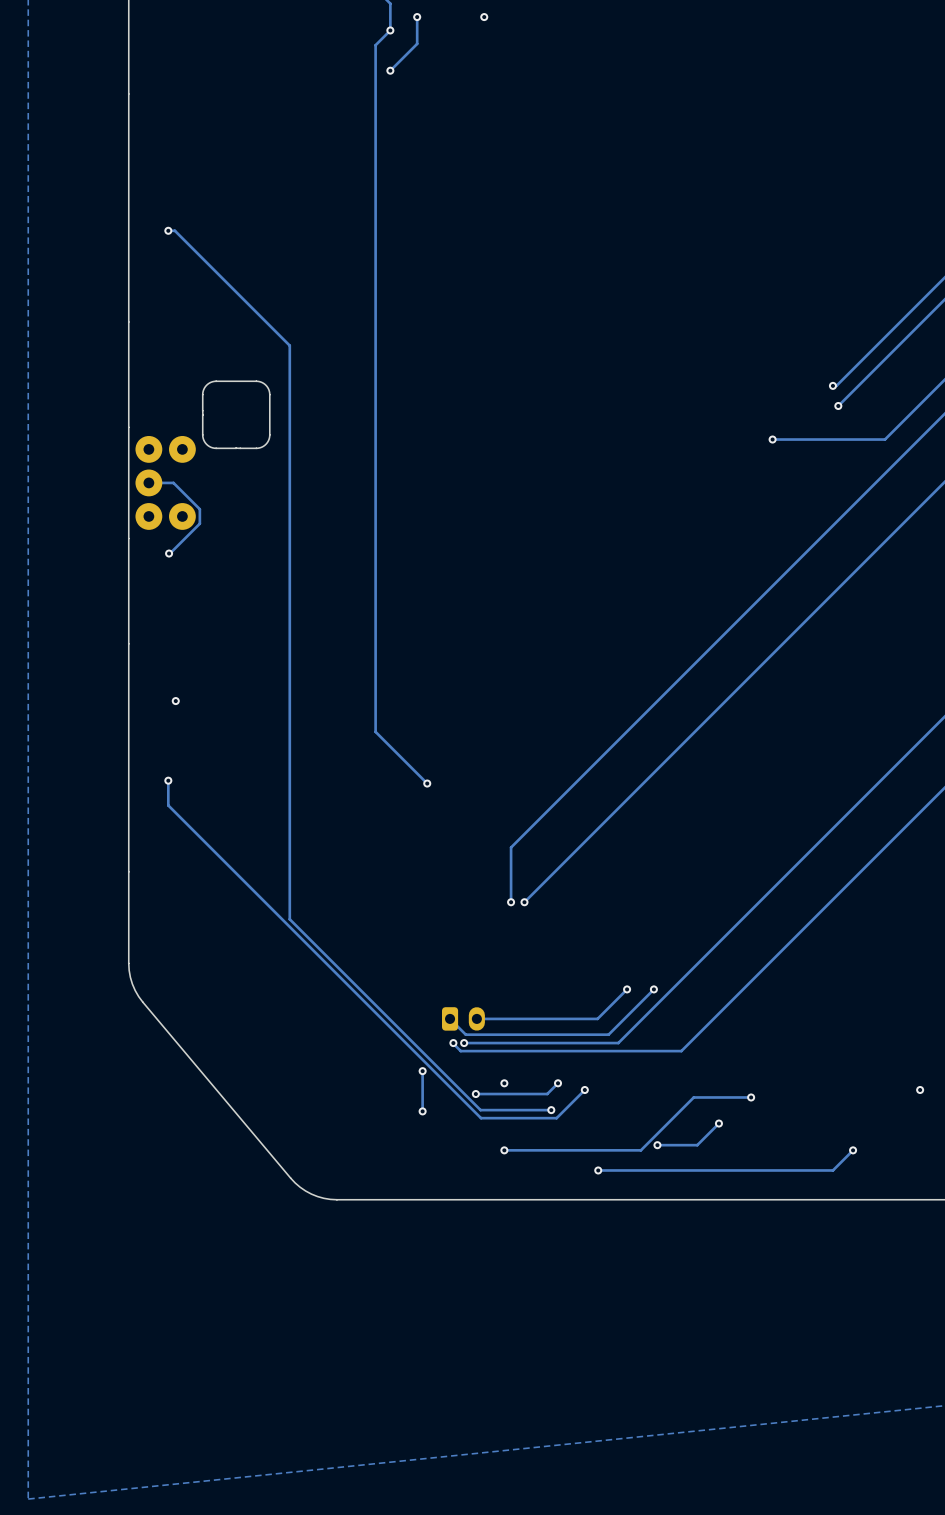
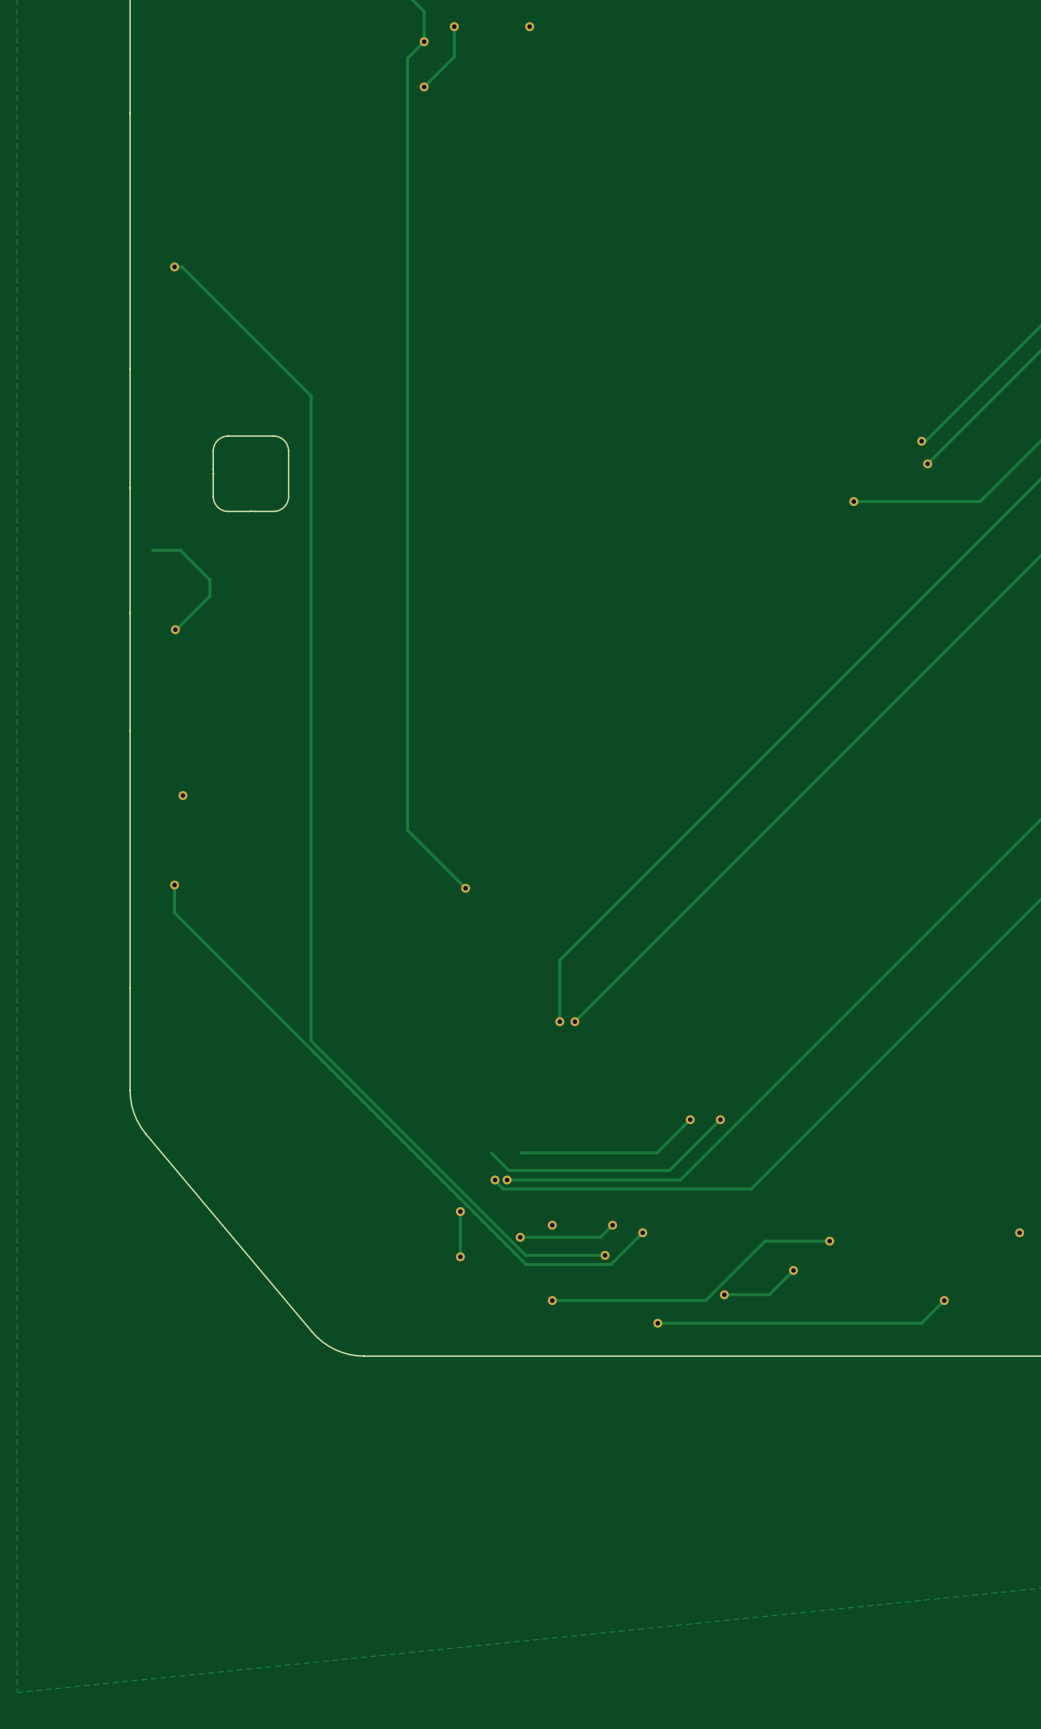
part: (165, 482) -> none
part: (463, 1018) -> none

